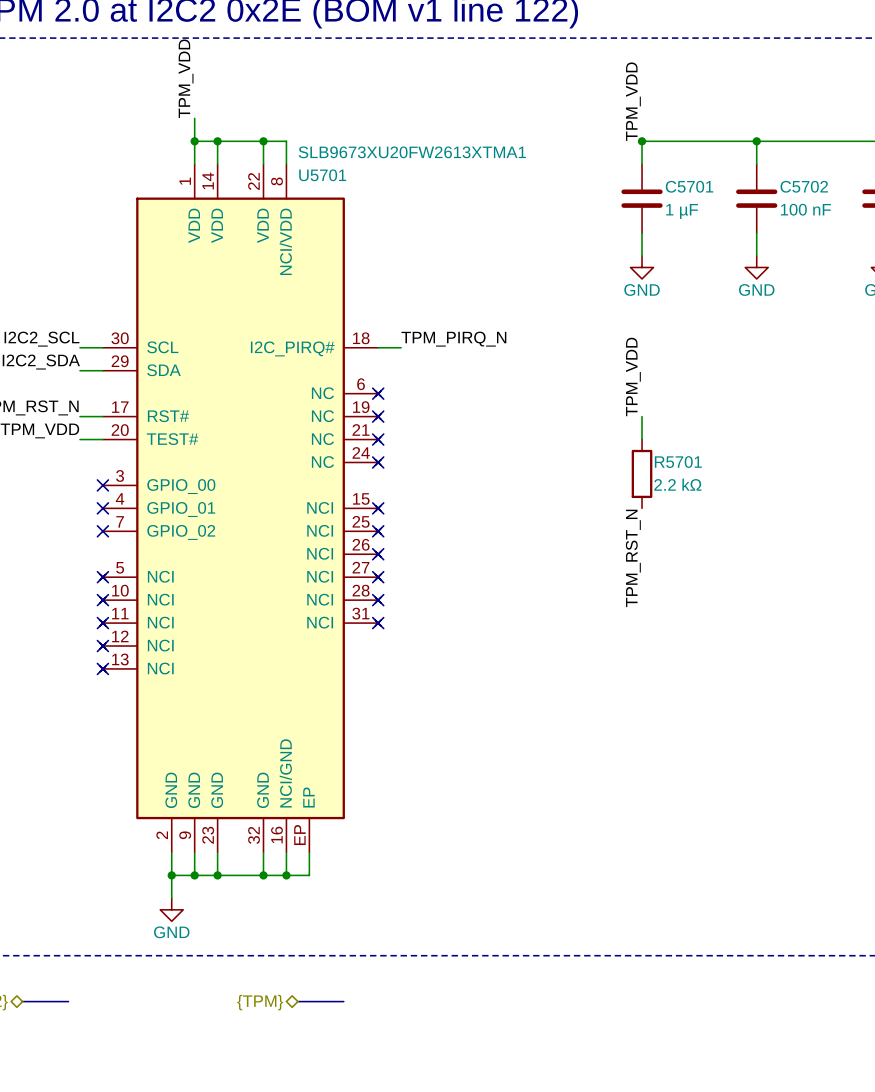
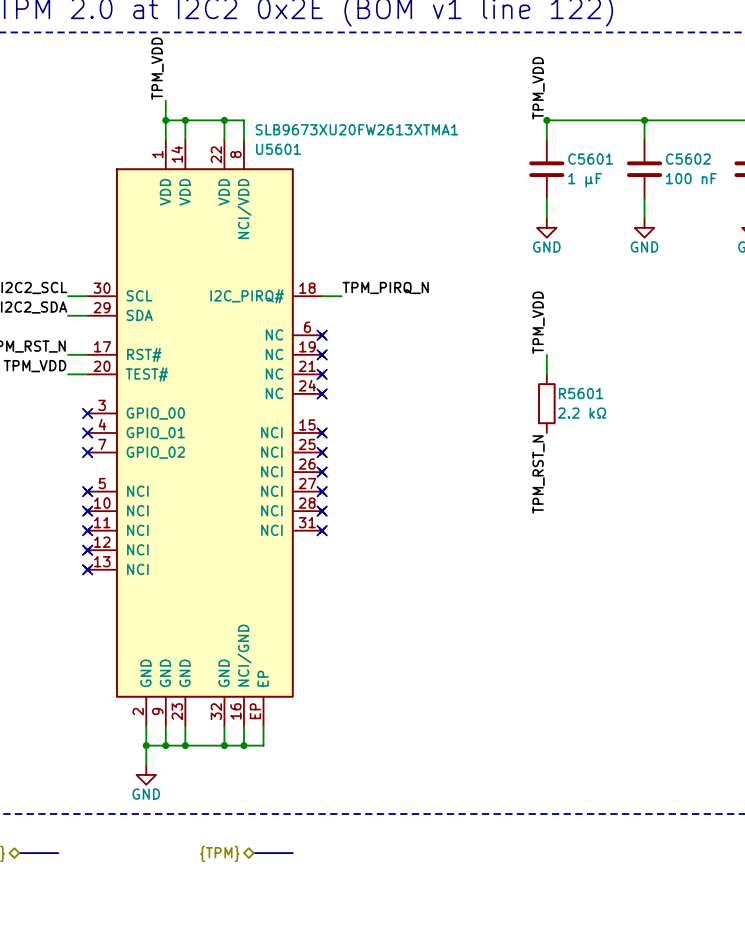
U5701 name: U5701 (322, 175) -> U5601 (278, 149)
C5701 name: C5701 (689, 186) -> C5601 (590, 159)
C5702 name: C5702 (804, 186) -> C5602 (688, 159)
R5701 name: R5701 (678, 462) -> R5601 (581, 393)

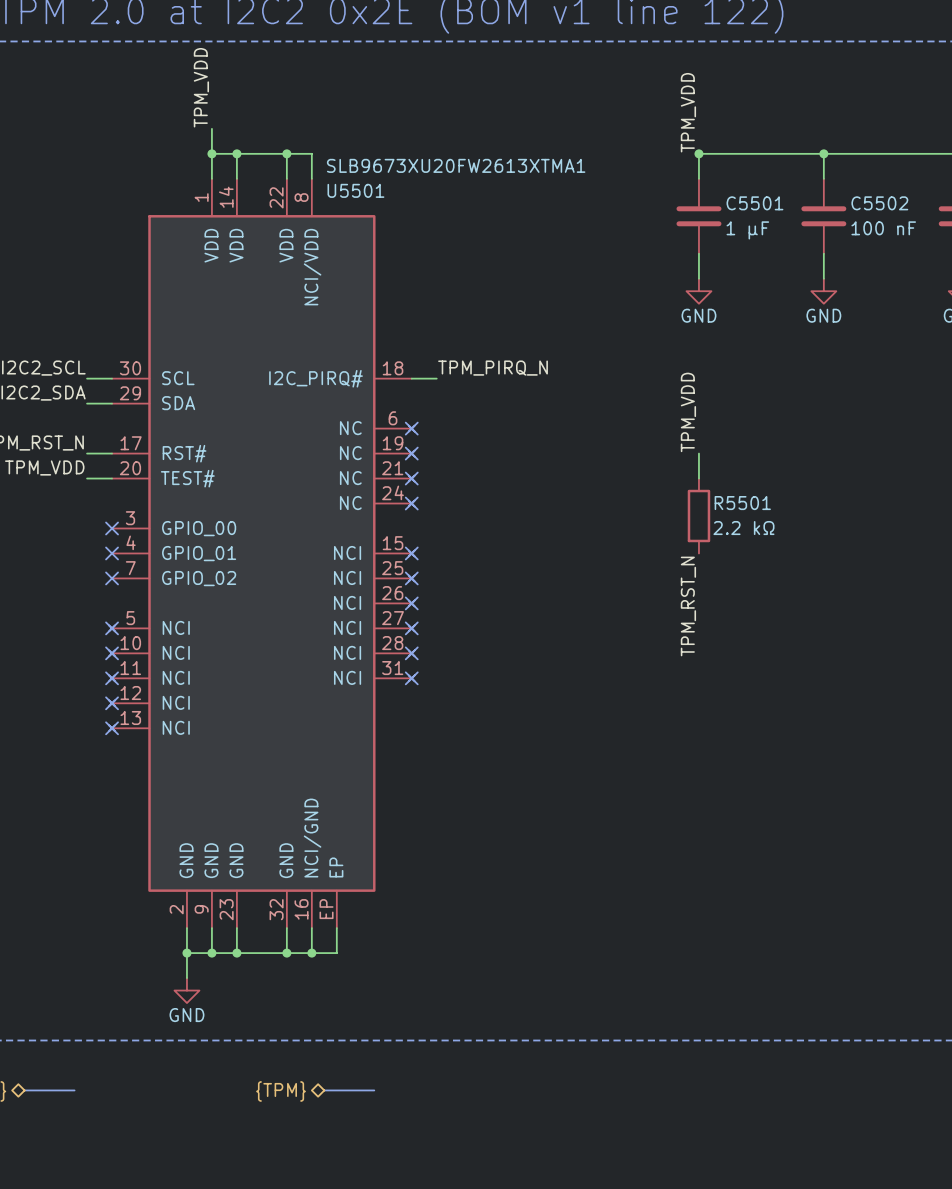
U5601 name: U5601 (278, 149) -> U5501 (355, 190)
C5601 name: C5601 (590, 159) -> C5501 (754, 203)
C5602 name: C5602 (688, 159) -> C5502 (879, 203)
R5601 name: R5601 (581, 393) -> R5501 (742, 503)

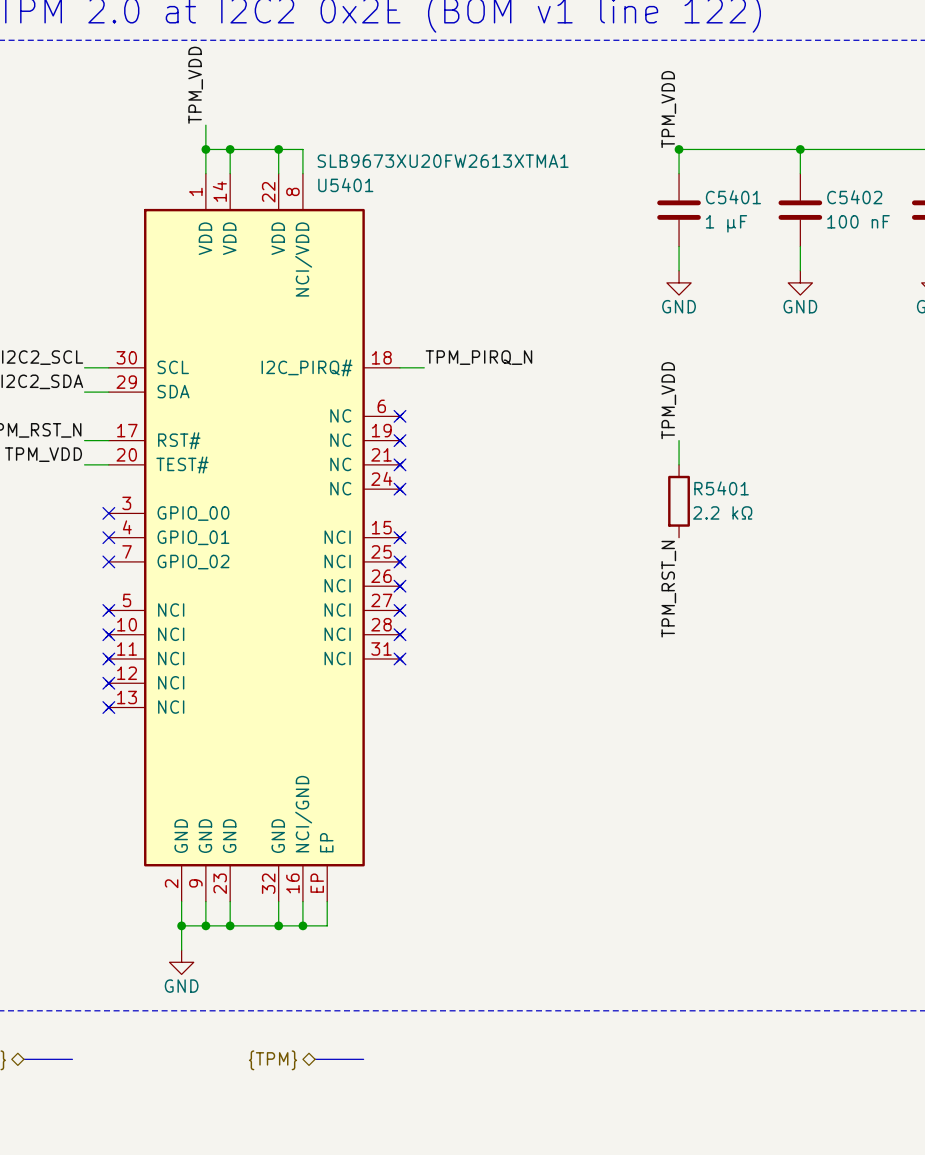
U5501 name: U5501 (355, 190) -> U5401 (345, 185)
C5501 name: C5501 (754, 203) -> C5401 (733, 197)
C5502 name: C5502 (879, 203) -> C5402 (854, 197)
R5501 name: R5501 (742, 503) -> R5401 (721, 488)

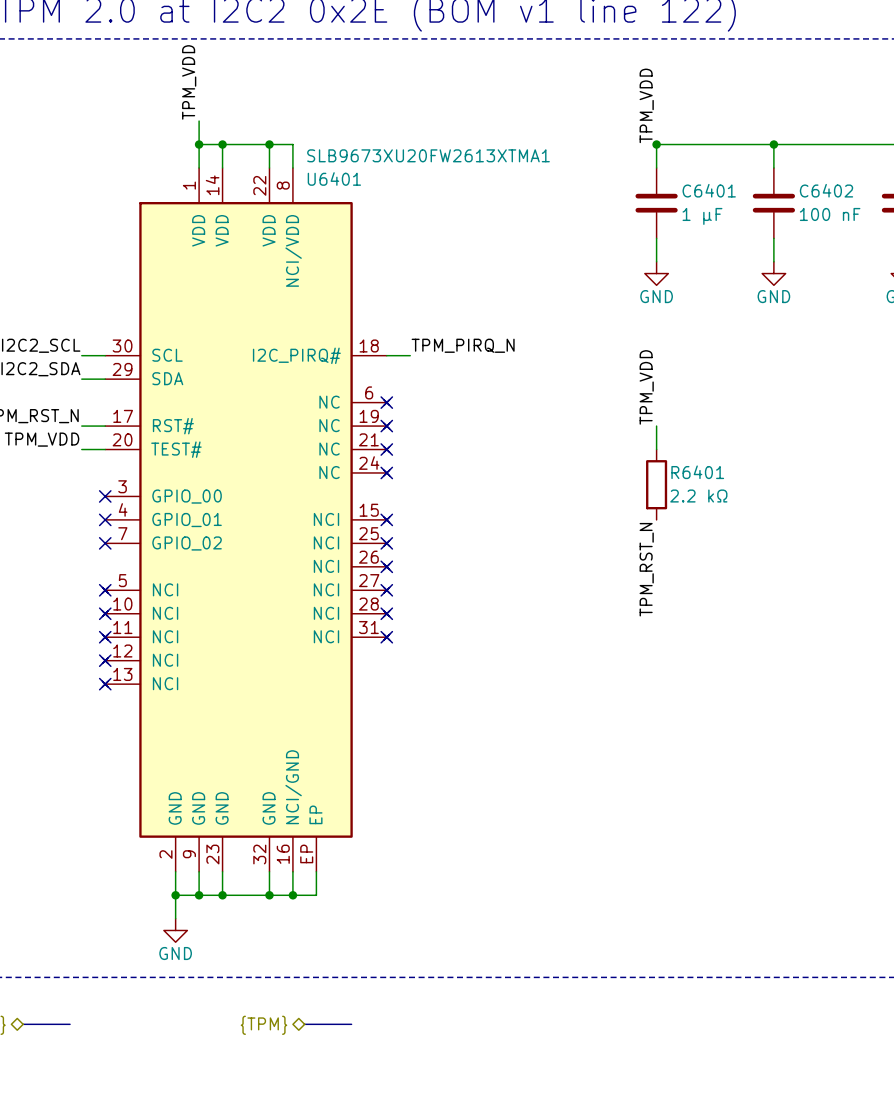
U5401 name: U5401 (345, 185) -> U6401 (334, 178)
C5401 name: C5401 (733, 197) -> C6401 (709, 190)
C5402 name: C5402 (854, 197) -> C6402 (826, 190)
R5401 name: R5401 (721, 488) -> R6401 (697, 472)

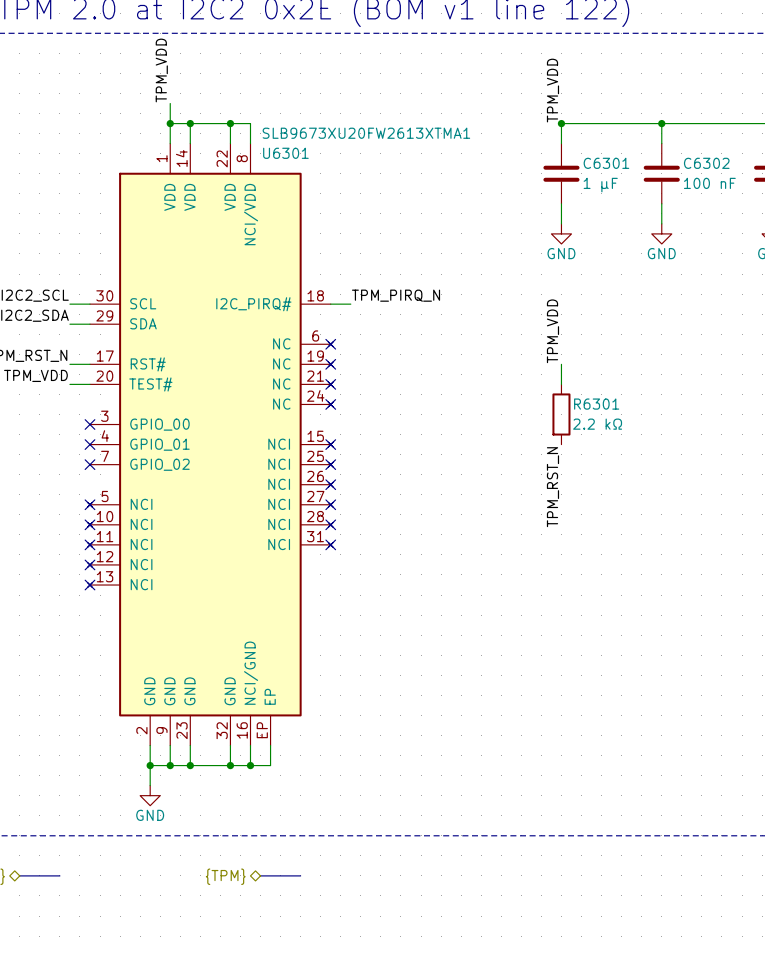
U6401 name: U6401 (334, 178) -> U6301 (285, 153)
C6401 name: C6401 (709, 190) -> C6301 (606, 163)
C6402 name: C6402 (826, 190) -> C6302 (706, 163)
R6401 name: R6401 (697, 472) -> R6301 (596, 404)

